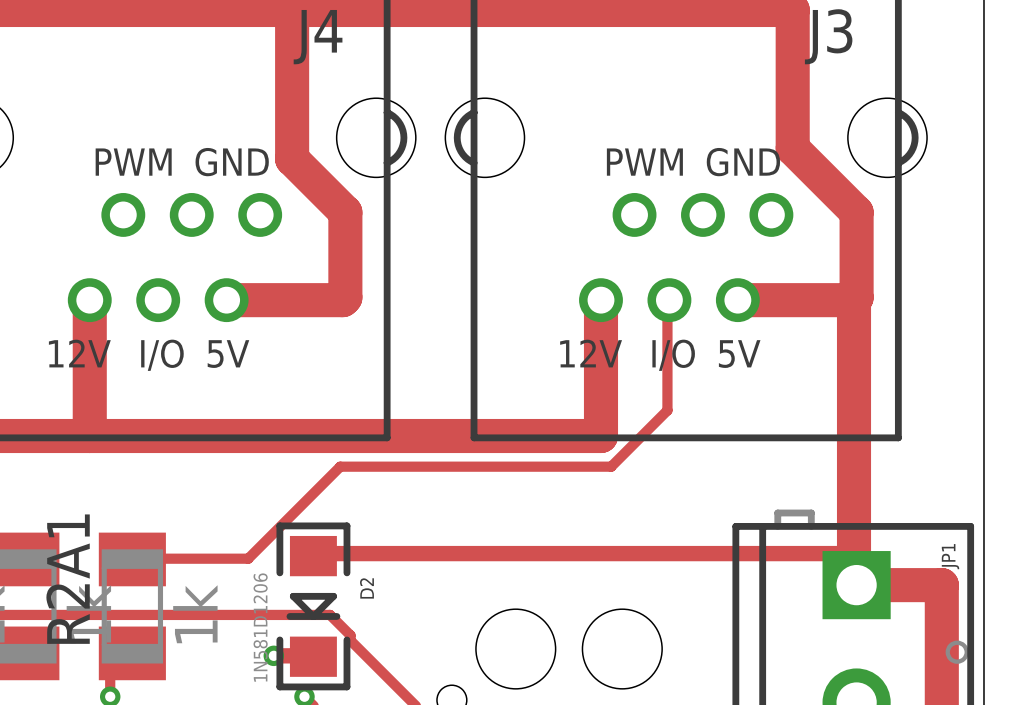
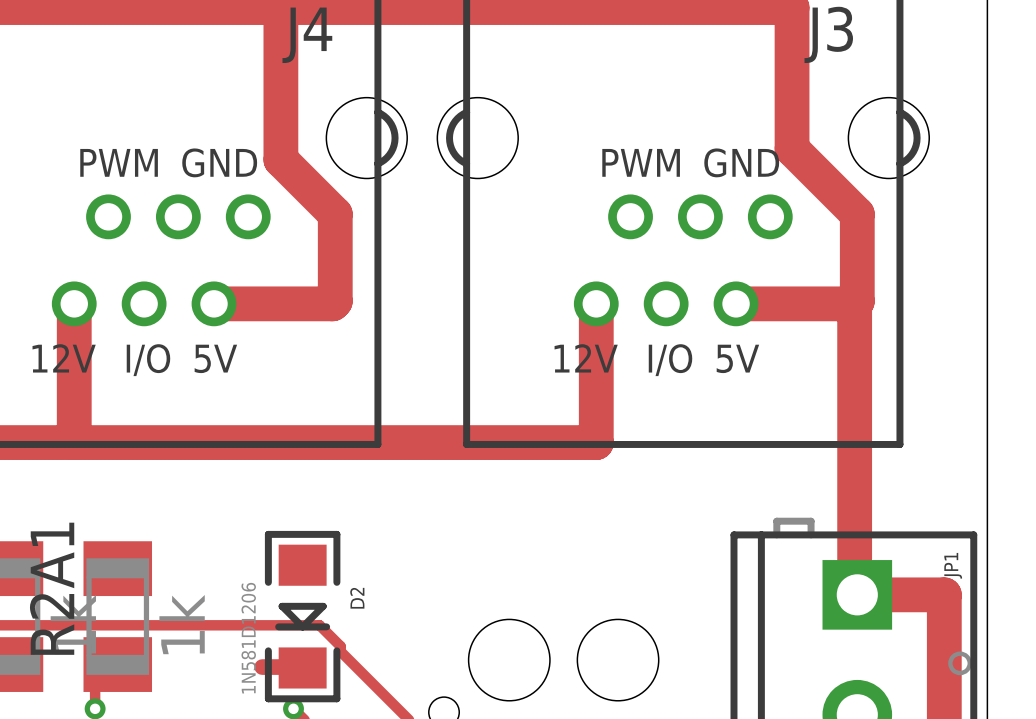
track: (669, 300) (667, 303) (667, 410) (611, 466) (340, 466) (248, 558) (132, 559) -> none
track: (313, 556) (314, 553) (841, 553) (856, 585) -> none
via: (273, 655) -> none

